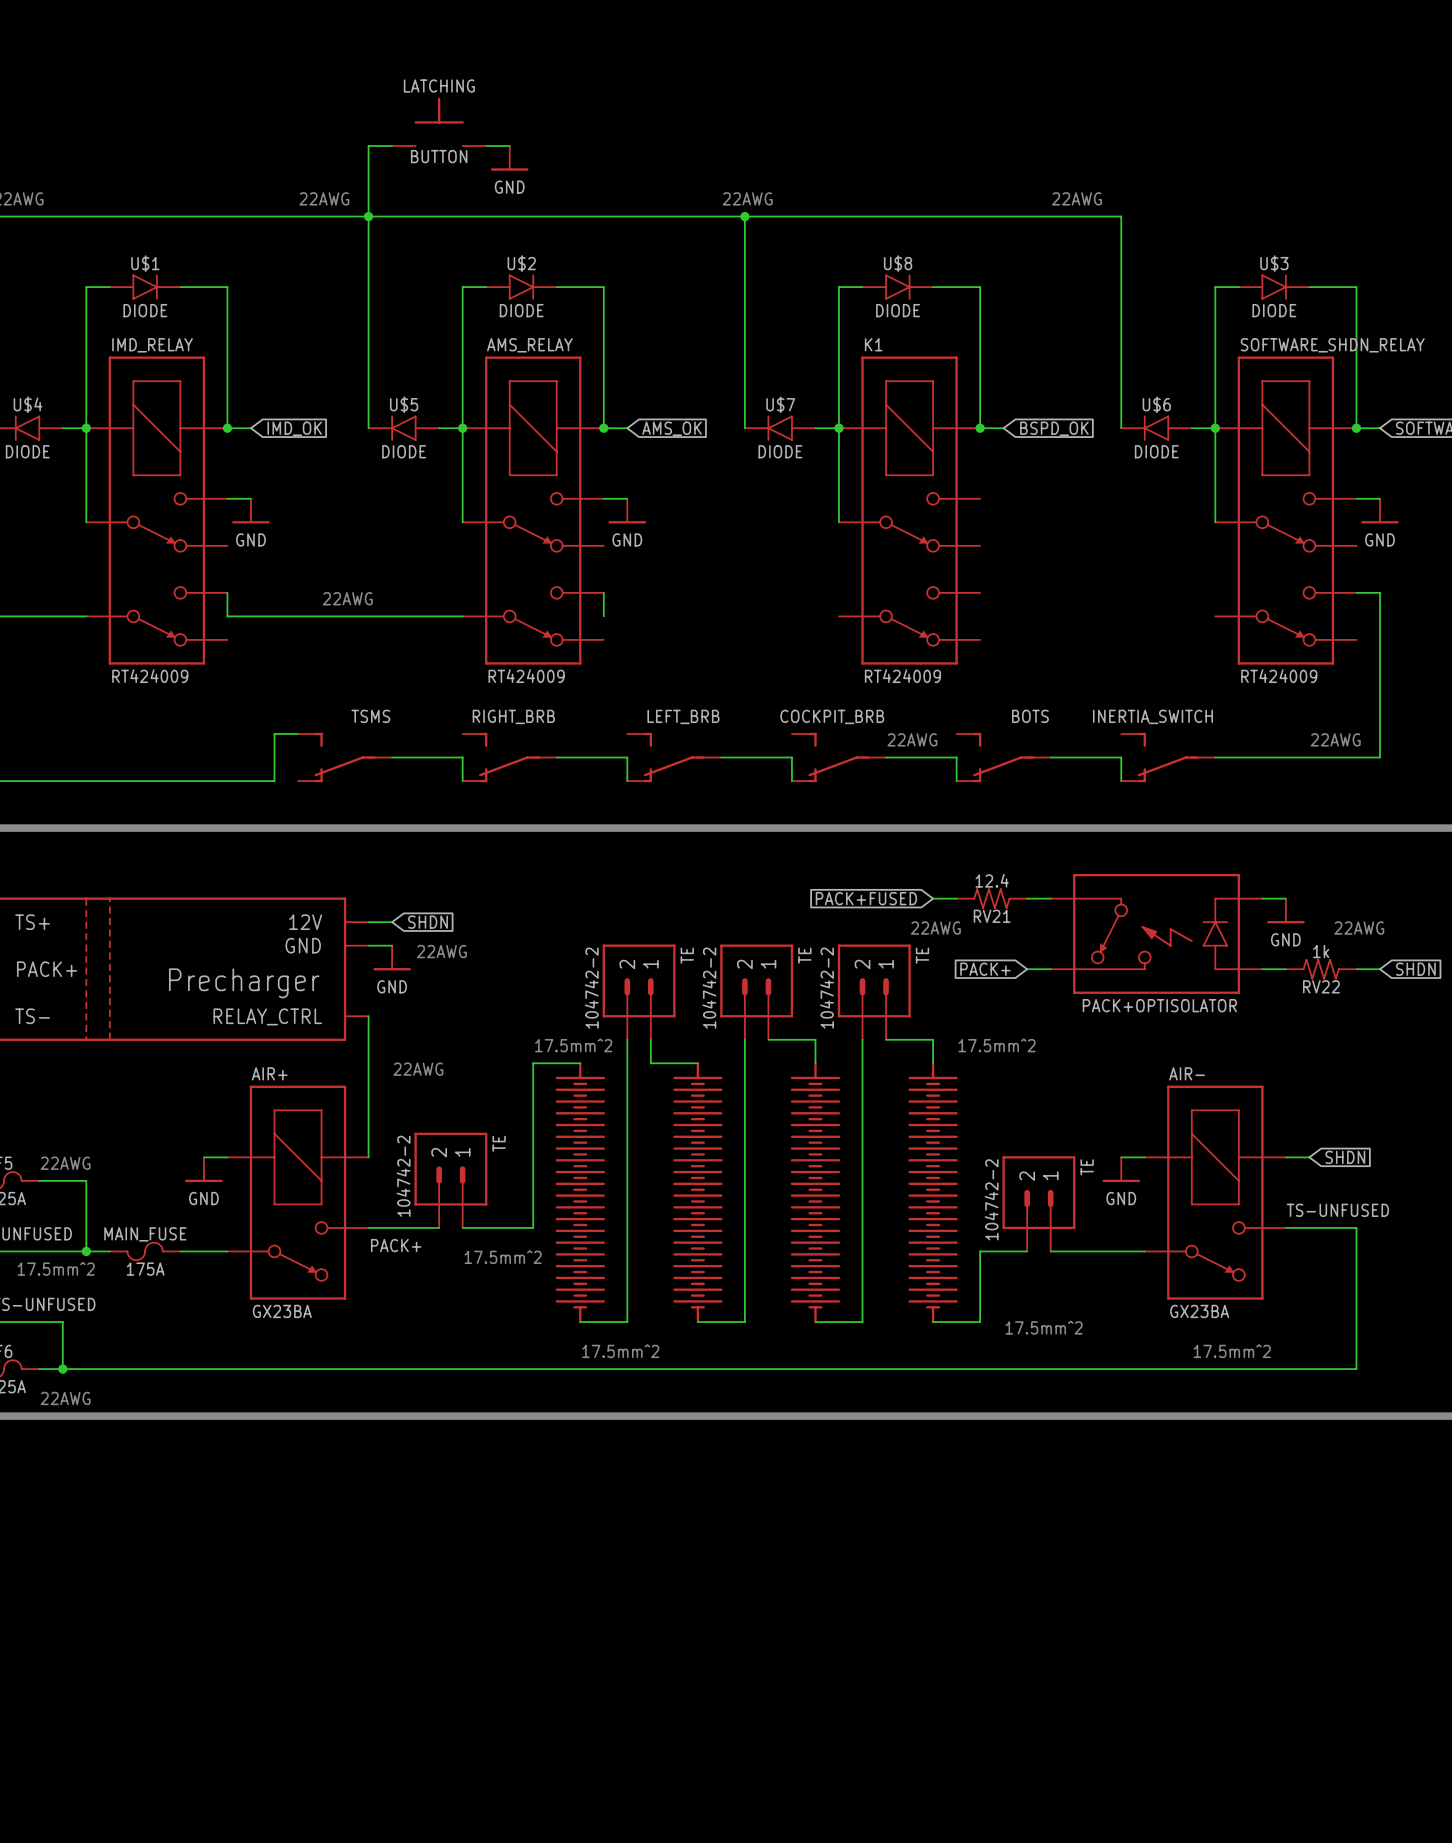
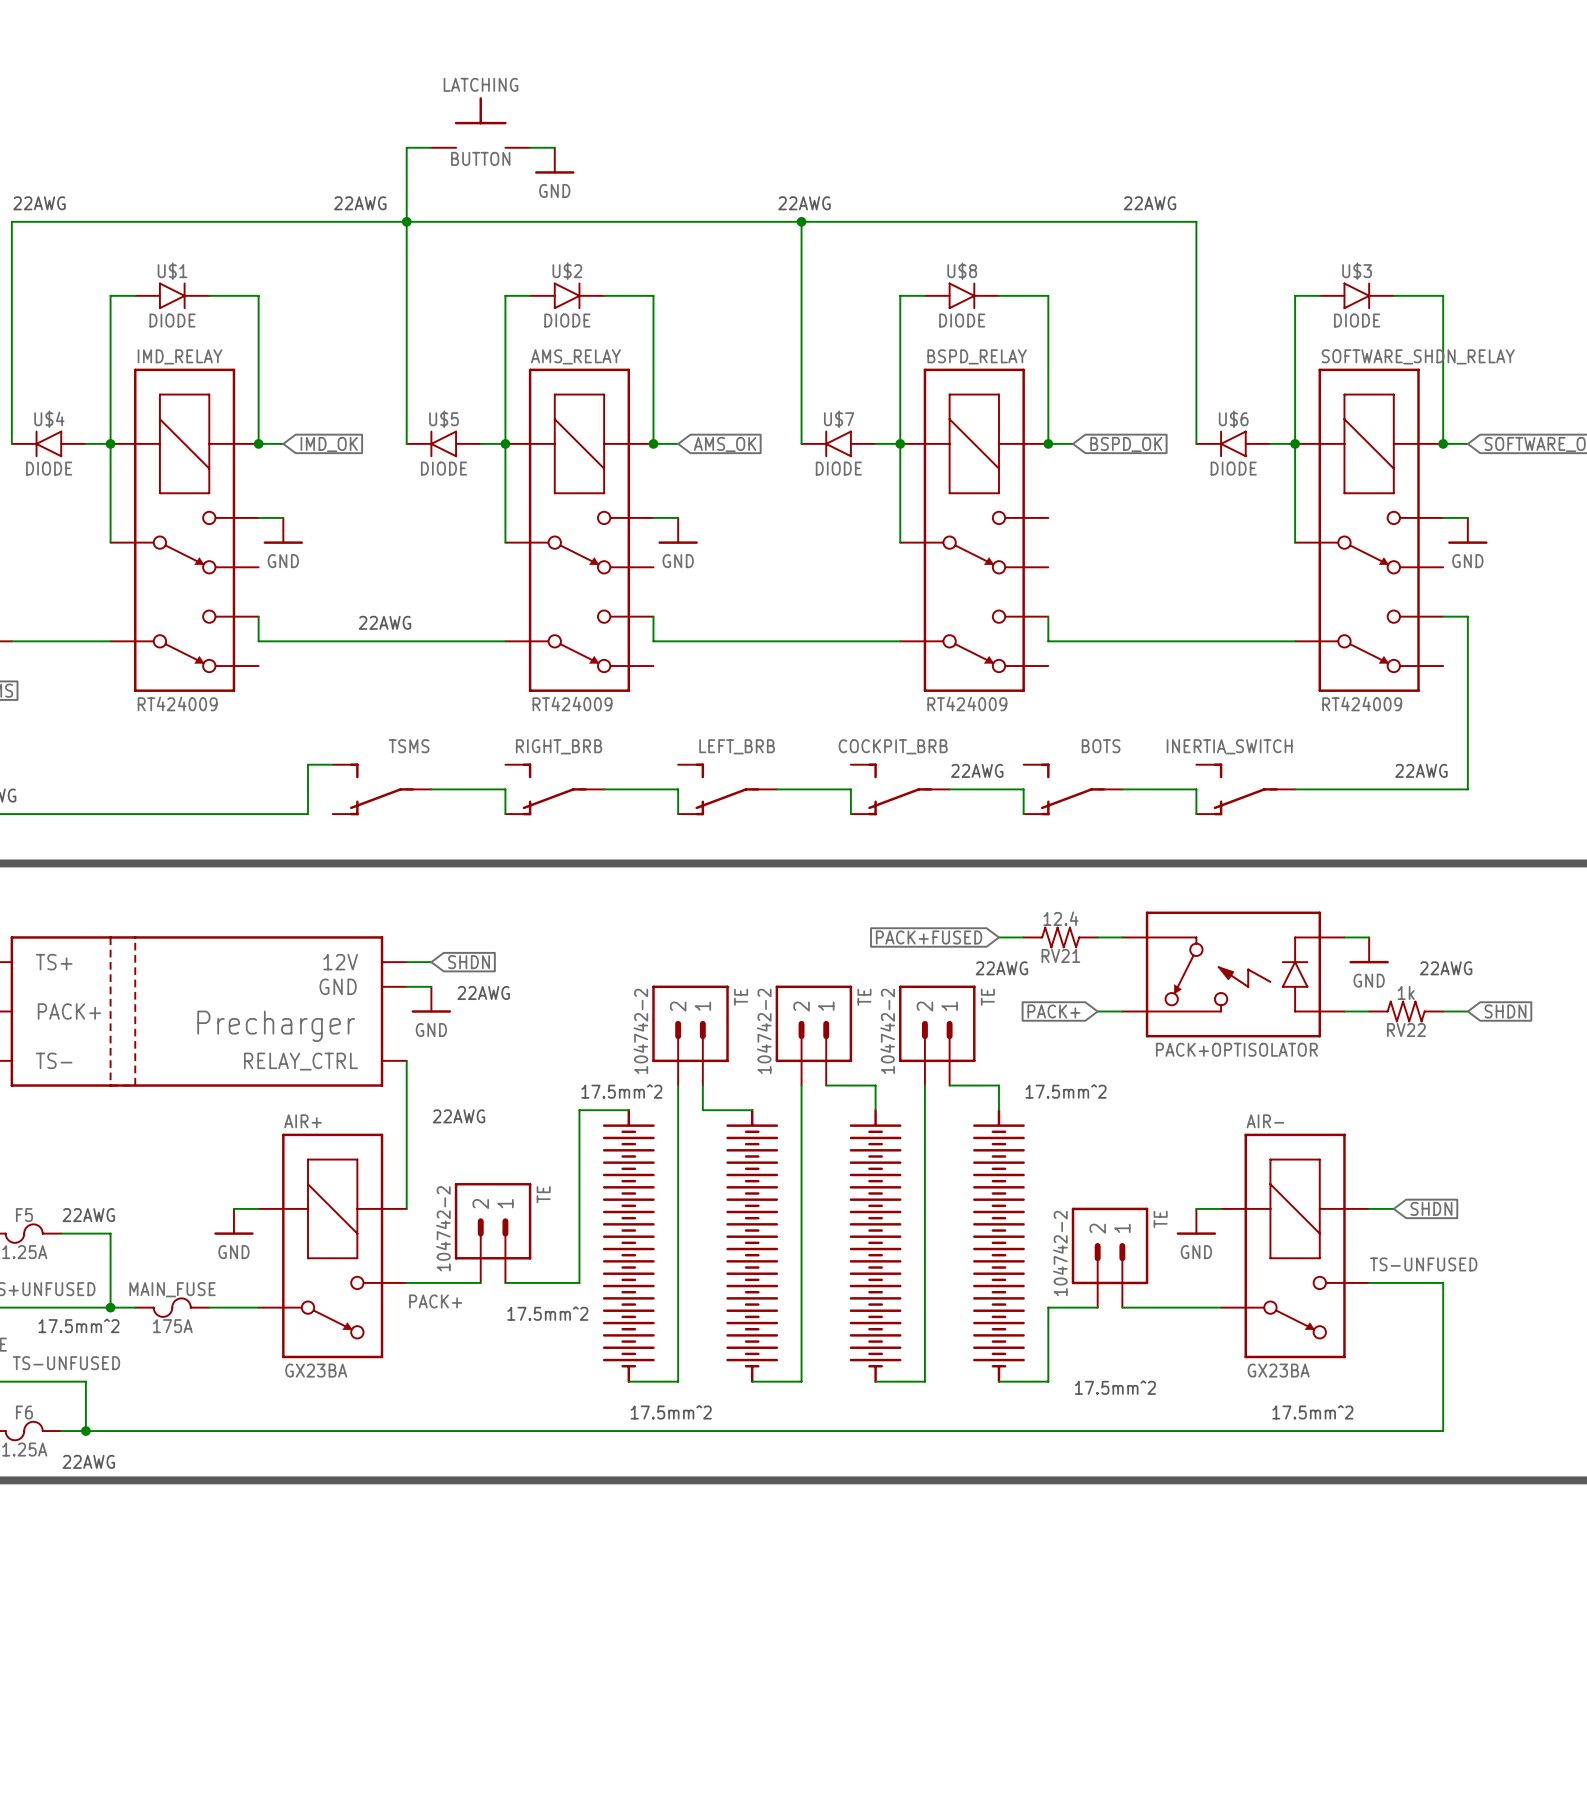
K1 name: K1 (873, 344) -> BSPD_RELAY (977, 356)
wire: none -> (1048, 616) (1048, 641) (1295, 641)
wire: none -> (653, 641) (900, 641)

